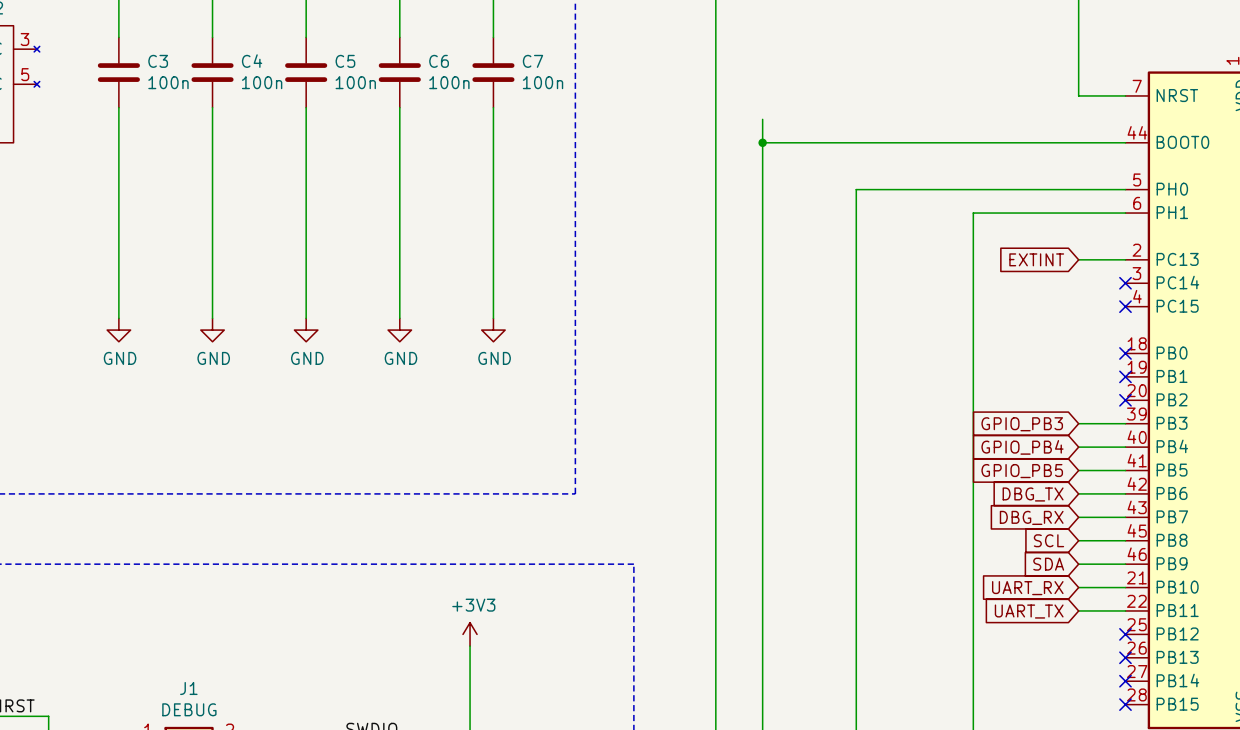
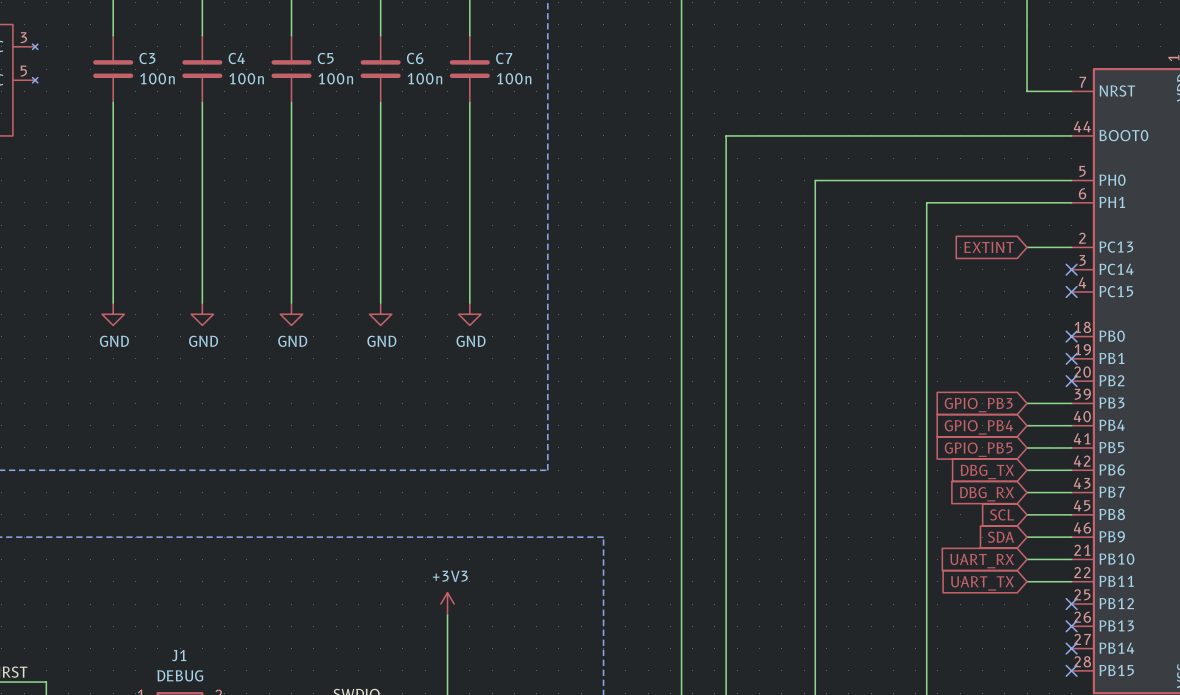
wire: (762, 119) (762, 142) -> none
junction: (762, 142) -> none

